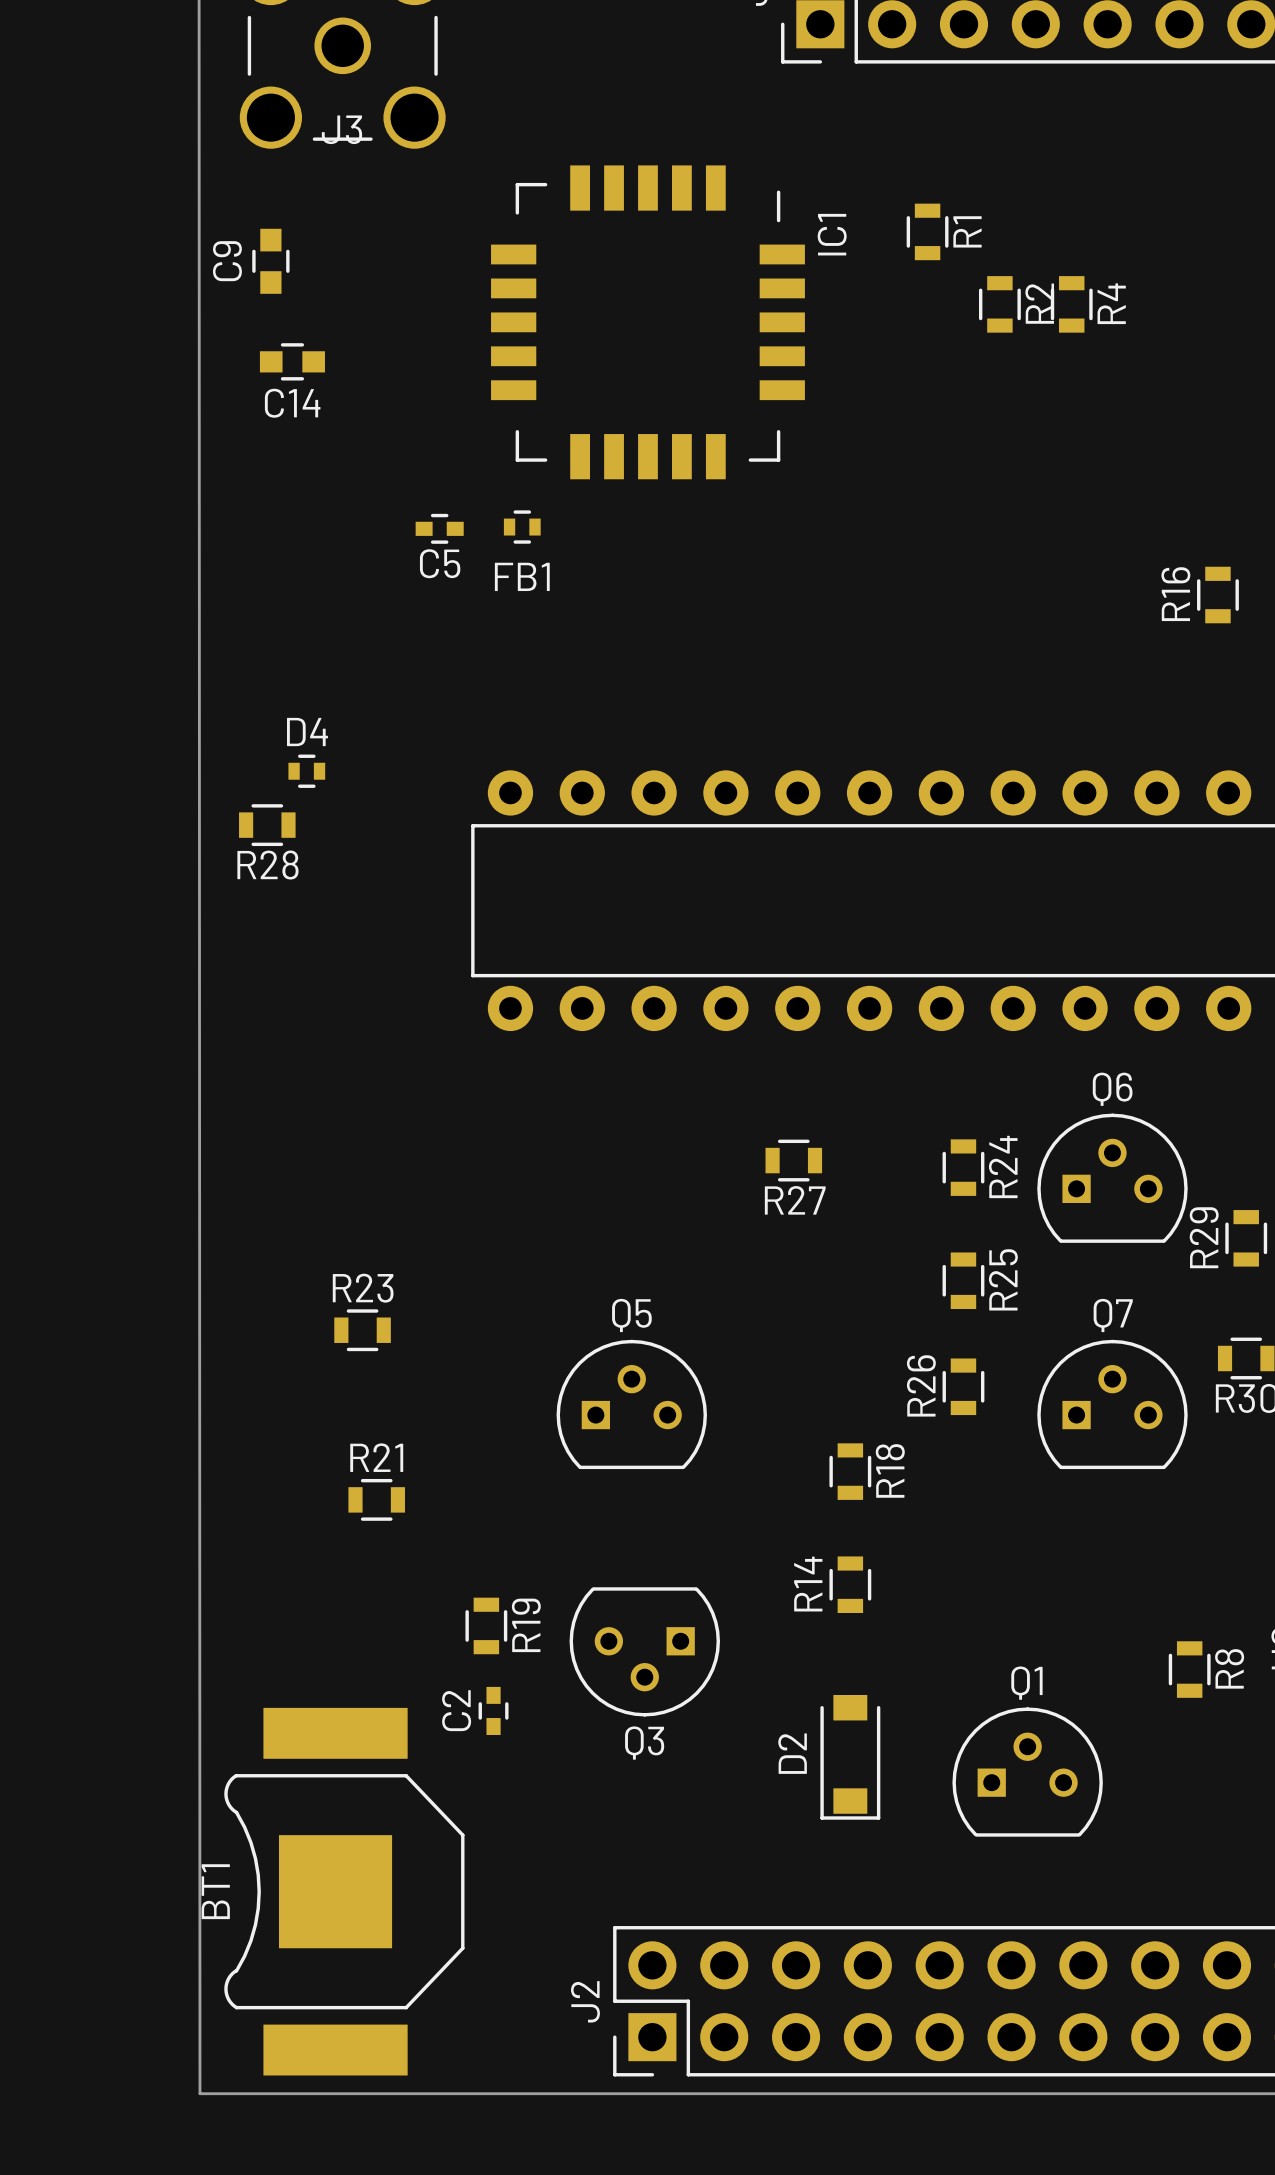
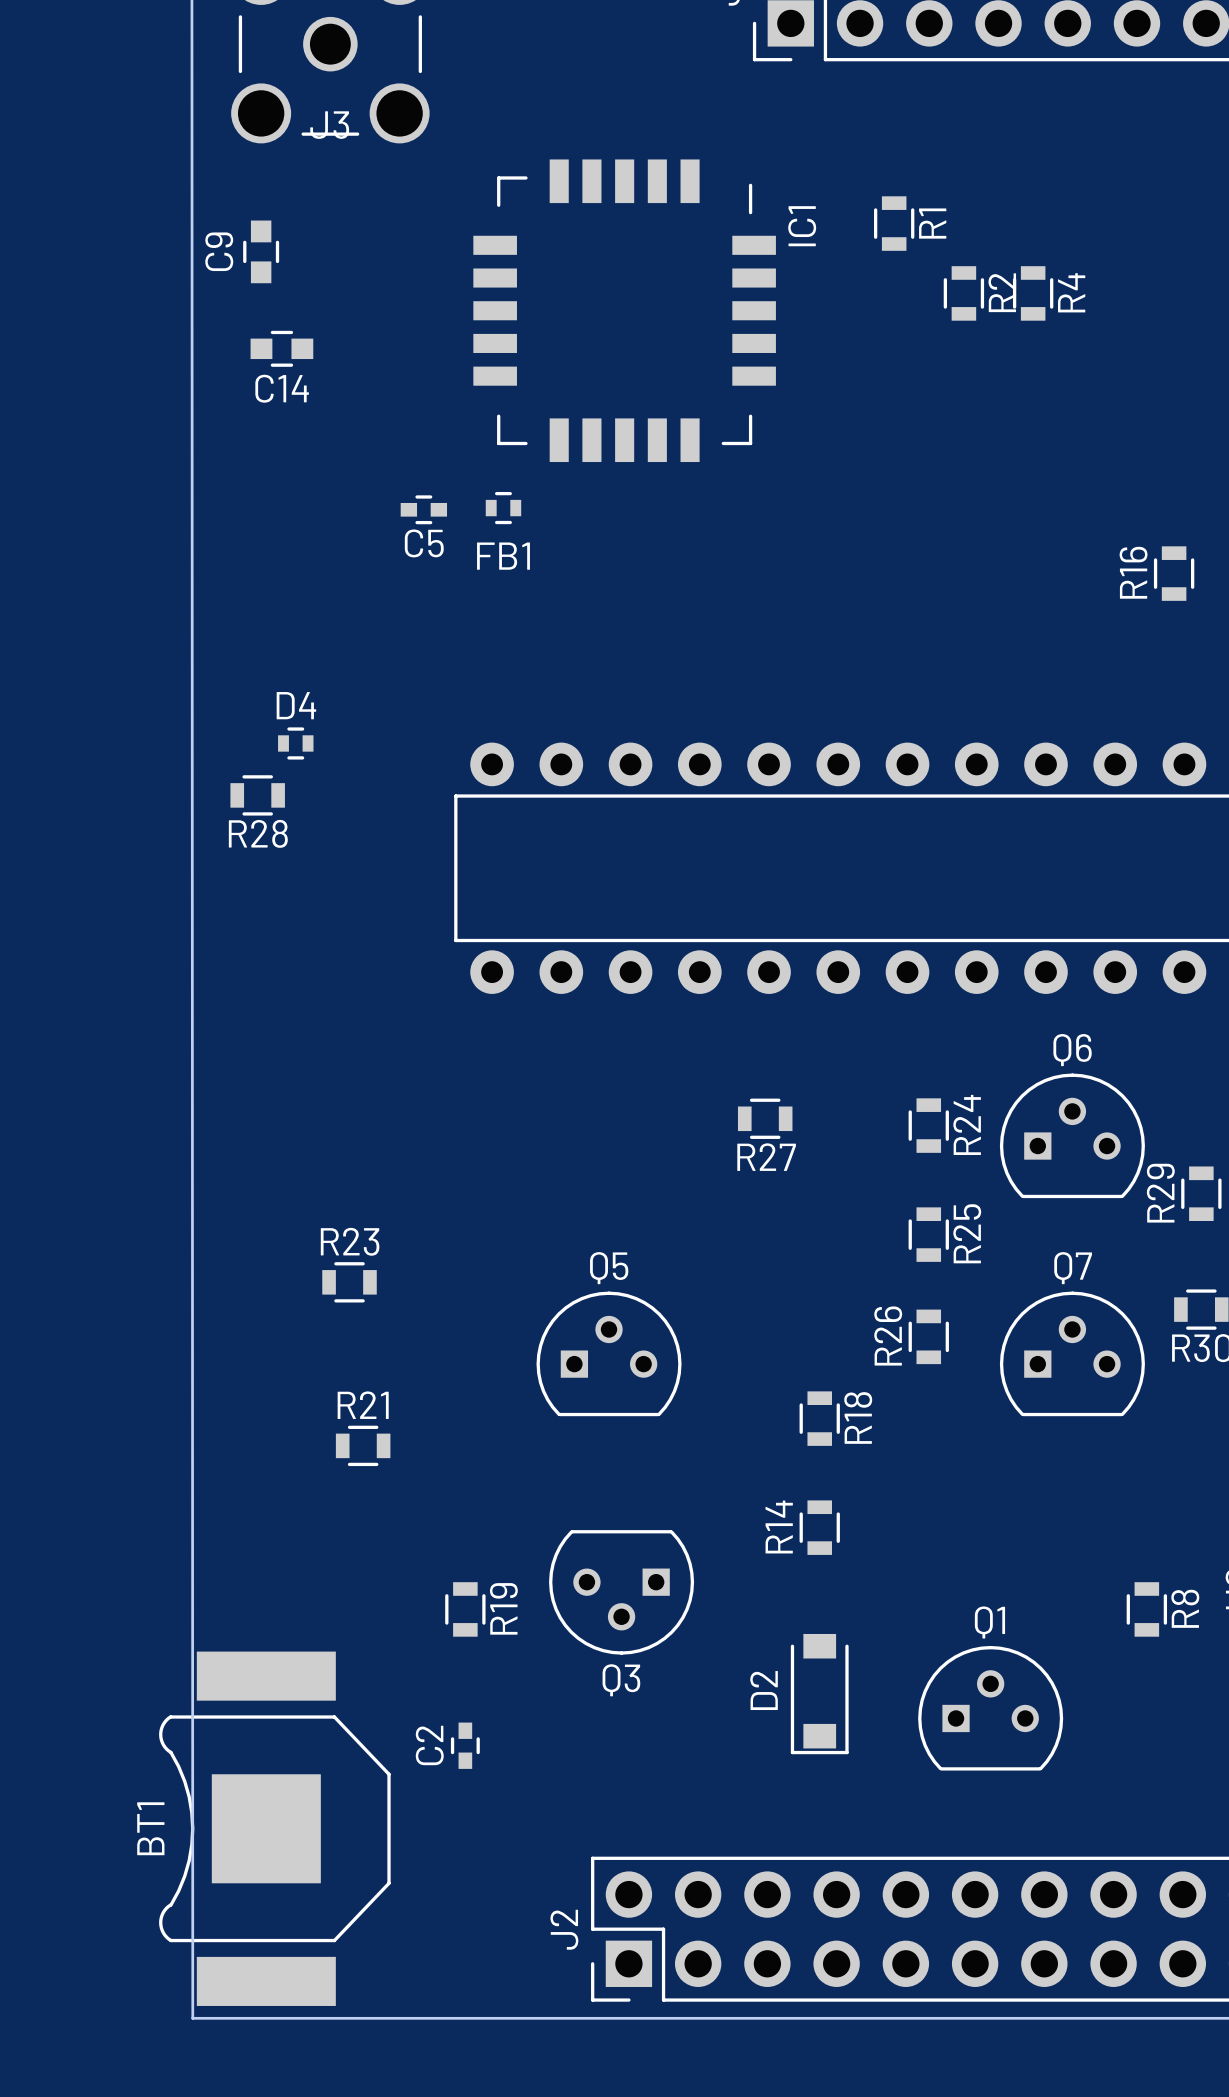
R19 position: (486, 1625) -> (465, 1609)
C2 position: (493, 1710) -> (465, 1745)
BT1 position: (344, 1891) -> (274, 1828)

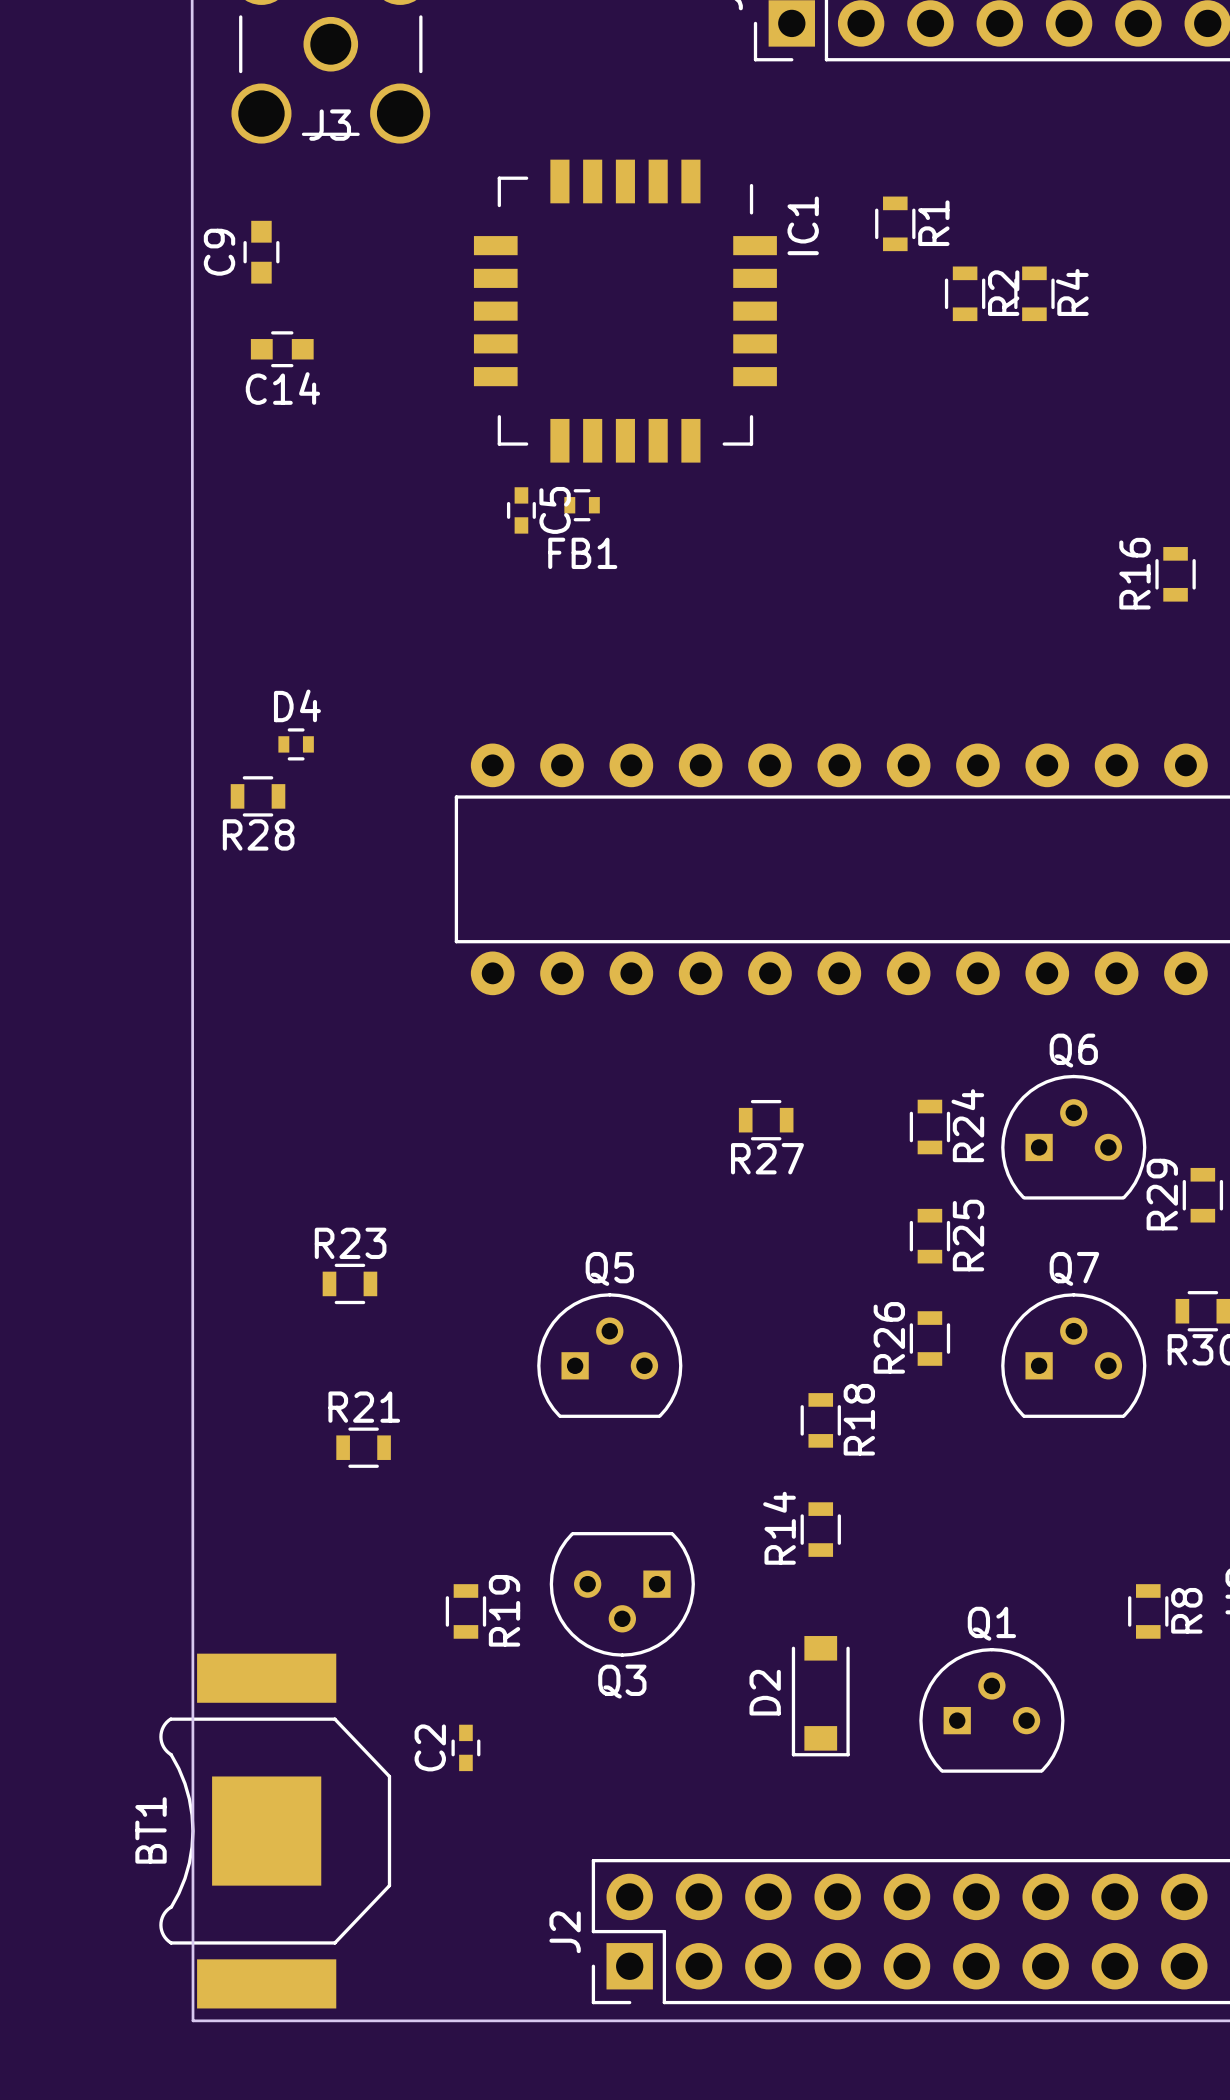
FB1 position: (503, 508) -> (582, 505)
C5 rotation: 0° (423, 509) -> 90° clockwise (521, 510)
C5 position: (423, 509) -> (521, 510)

